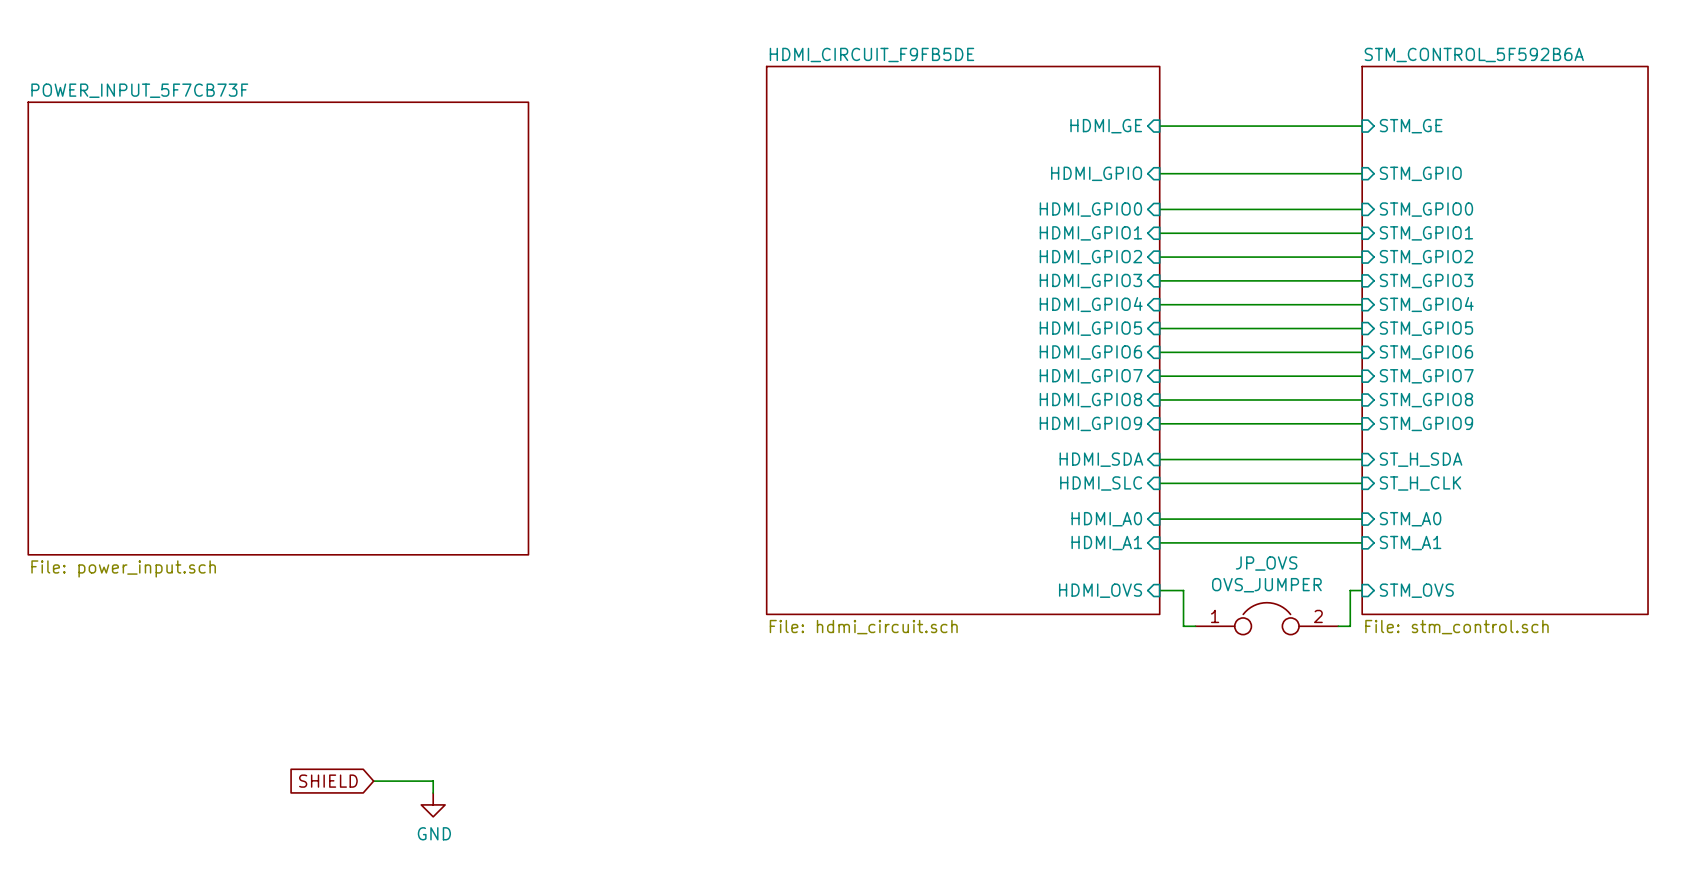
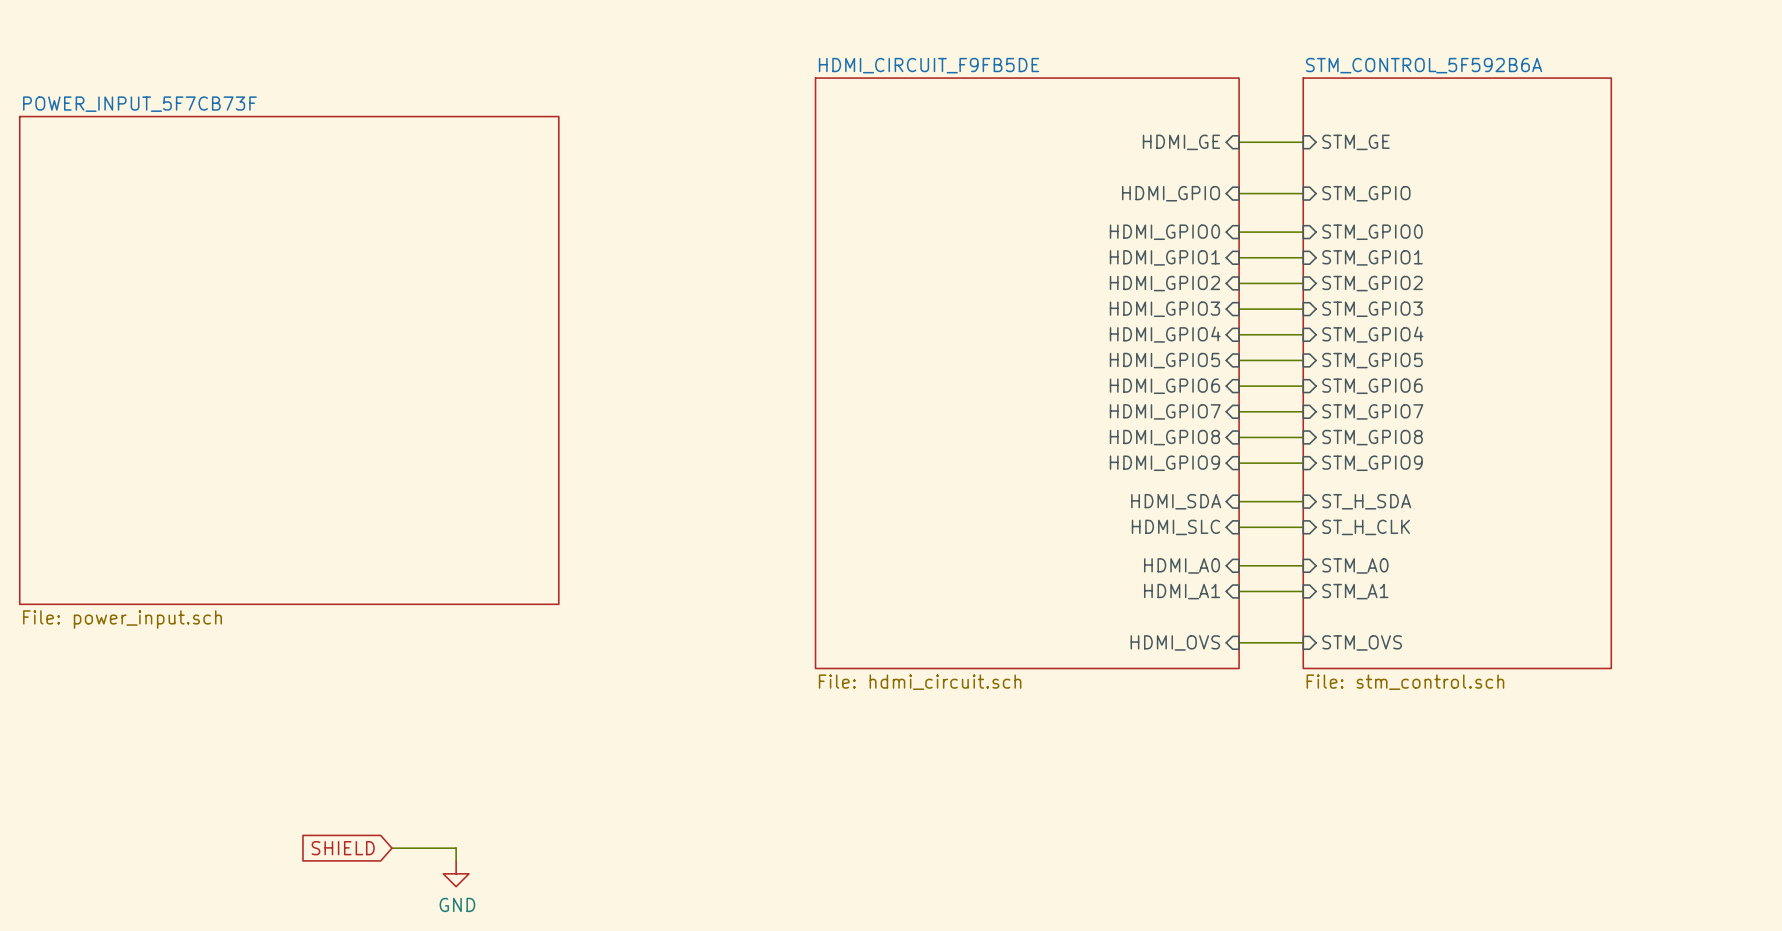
wire: (1219, 126) (1362, 126) -> none
sheet pin position: STM_GE (1411, 126) -> STM_GE (1356, 142)
wire: (1219, 173) (1362, 173) -> none
sheet pin position: STM_GPIO (1420, 173) -> STM_GPIO (1366, 193)
wire: (1219, 209) (1362, 209) -> none
sheet pin position: STM_GPIO0 (1426, 209) -> STM_GPIO0 (1372, 232)
wire: (1219, 233) (1362, 233) -> none
sheet pin position: STM_GPIO1 (1426, 233) -> STM_GPIO1 (1372, 257)
wire: (1219, 257) (1362, 257) -> none
sheet pin position: STM_GPIO2 (1426, 257) -> STM_GPIO2 (1372, 283)
wire: (1219, 280) (1362, 280) -> none
sheet pin position: STM_GPIO3 (1426, 281) -> STM_GPIO3 (1372, 309)
wire: (1219, 304) (1362, 304) -> none
sheet pin position: STM_GPIO4 (1426, 304) -> STM_GPIO4 (1372, 334)
wire: (1219, 328) (1362, 328) -> none
sheet pin position: STM_GPIO5 (1426, 328) -> STM_GPIO5 (1372, 360)
sheet STM_CONTROL_5F592B6A position: (1505, 340) -> (1457, 373)
wire: (1219, 352) (1362, 352) -> none
sheet pin position: STM_GPIO6 (1426, 352) -> STM_GPIO6 (1372, 386)
wire: (1219, 376) (1362, 376) -> none
sheet pin position: STM_GPIO7 (1426, 376) -> STM_GPIO7 (1372, 411)
wire: (1219, 399) (1362, 399) -> none
sheet pin position: STM_GPIO8 (1426, 400) -> STM_GPIO8 (1372, 437)
wire: (1219, 423) (1362, 423) -> none
sheet pin position: STM_GPIO9 (1426, 423) -> STM_GPIO9 (1372, 463)
wire: (1219, 459) (1362, 459) -> none
sheet pin position: ST_H_SDA (1421, 459) -> ST_H_SDA (1366, 501)
wire: (1219, 483) (1362, 483) -> none
sheet pin position: ST_H_CLK (1420, 483) -> ST_H_CLK (1366, 527)
wire: (1219, 519) (1362, 519) -> none
sheet pin position: STM_A0 (1410, 519) -> STM_A0 (1355, 565)
wire: (1219, 542) (1362, 542) -> none
sheet pin position: STM_A1 (1410, 543) -> STM_A1 (1355, 591)
wire: (1183, 590) (1183, 626) (1195, 626) -> (1264, 642) (1303, 642)
wire: (1362, 590) (1350, 590) (1350, 626) (1338, 626) -> none
sheet pin position: STM_OVS (1416, 590) -> STM_OVS (1362, 642)
JP_OVS: OVS_JUMPER (1266, 618) -> none

